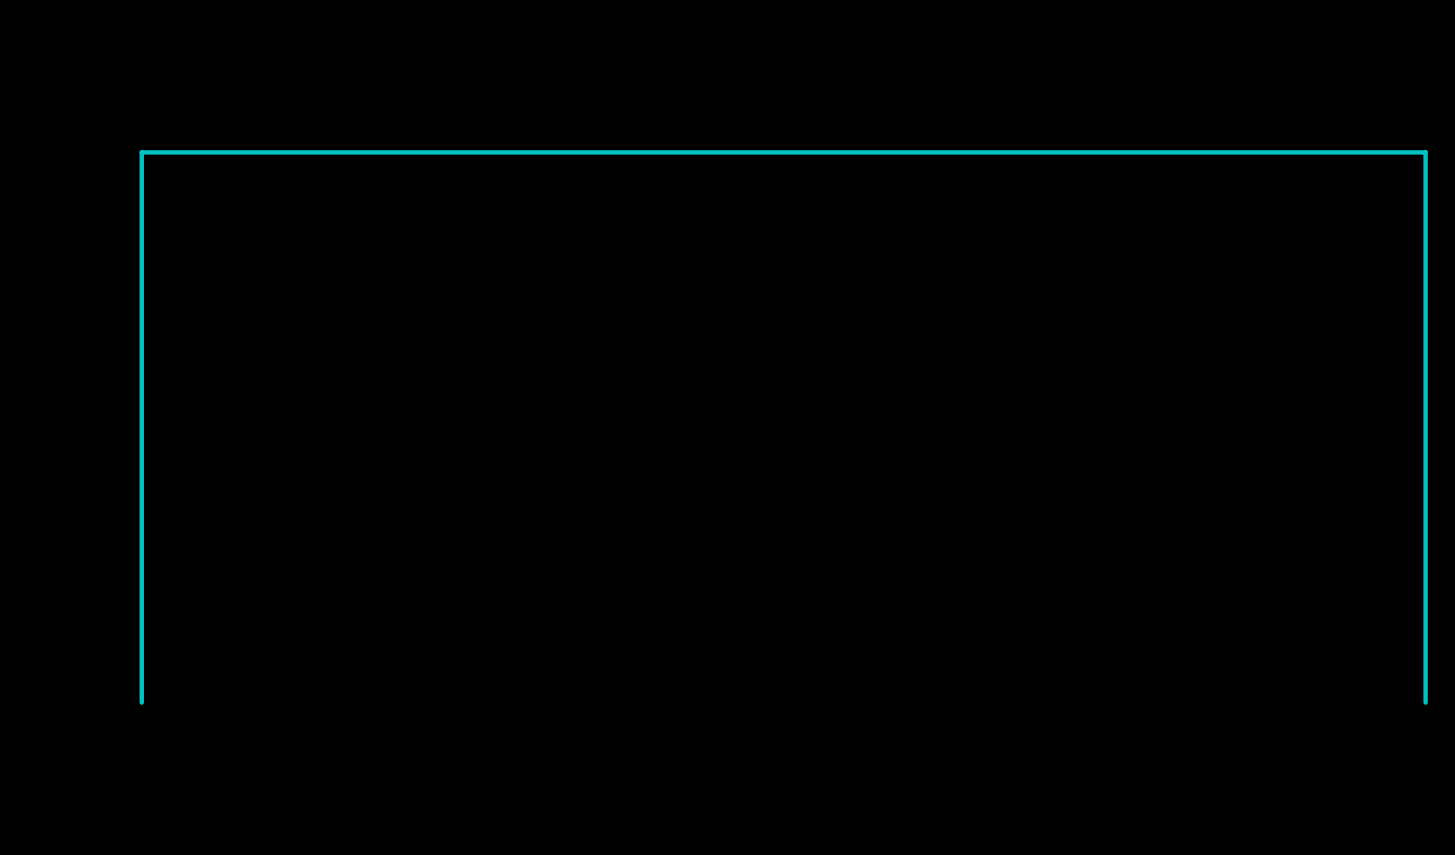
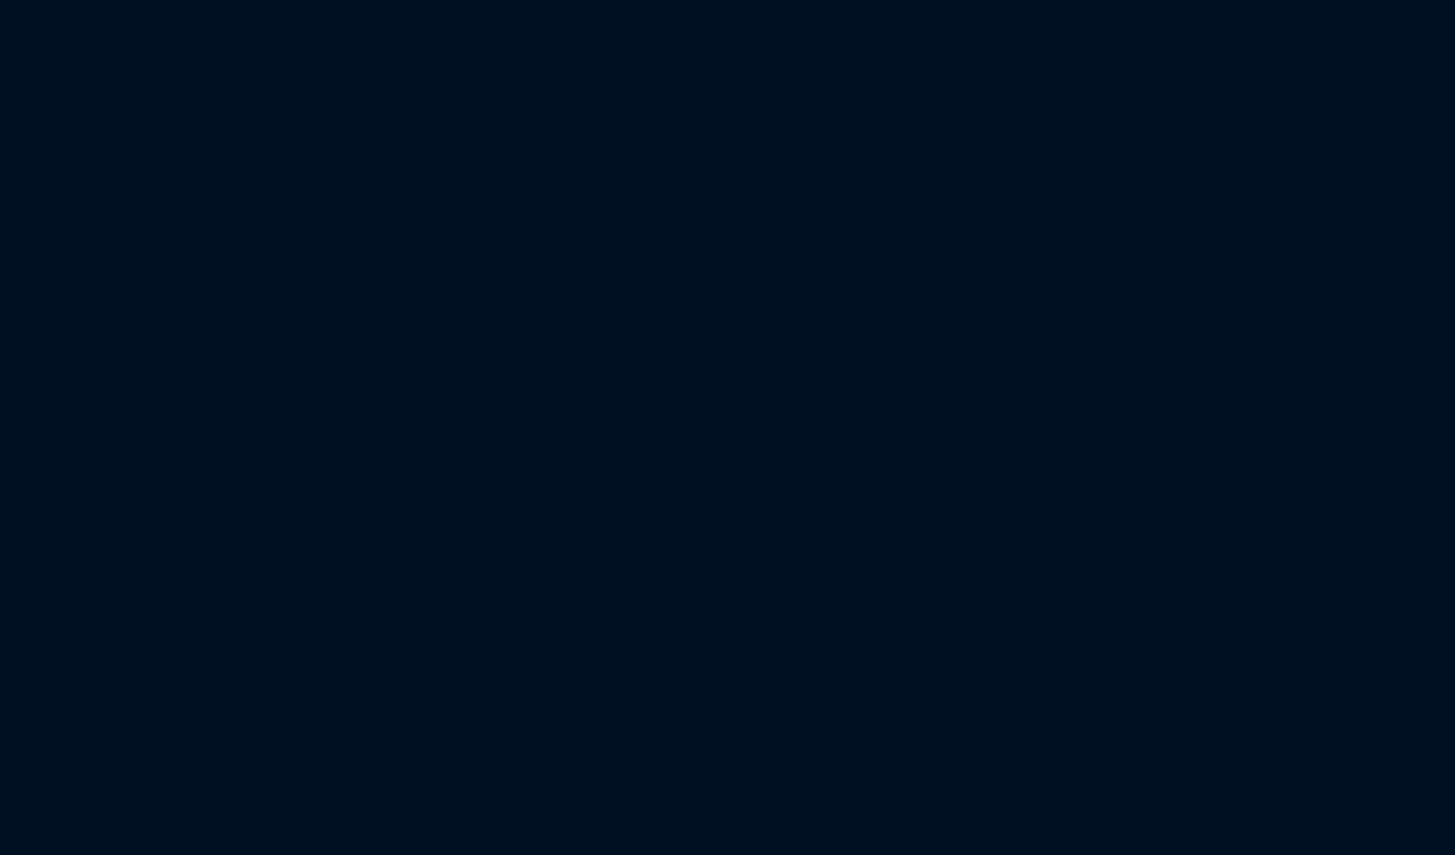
line: (141, 702) (141, 152) (1425, 152) (1425, 702) -> none

